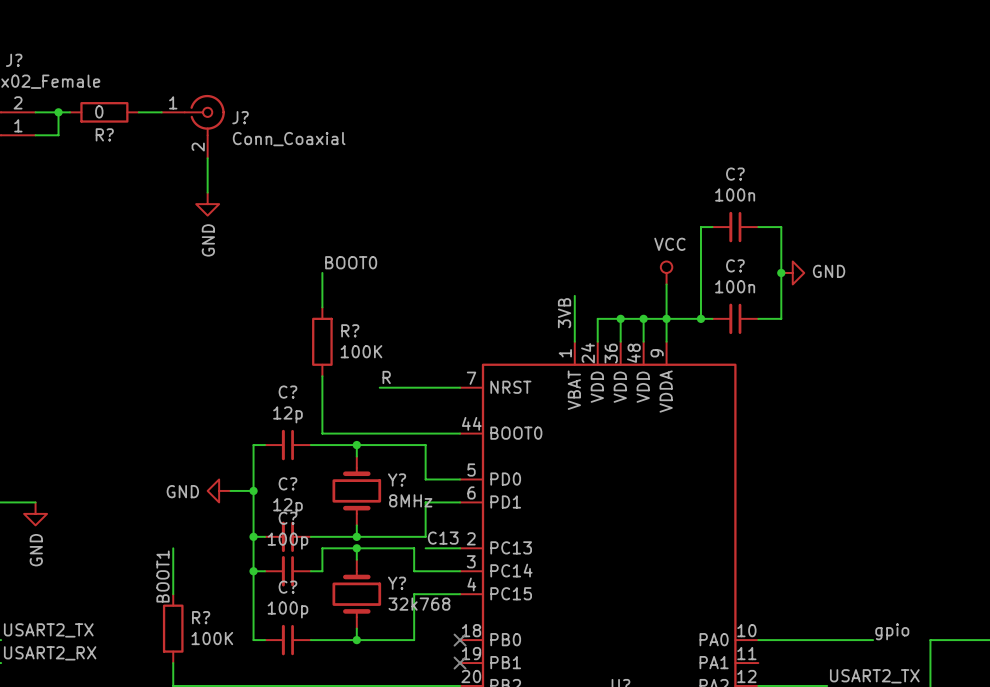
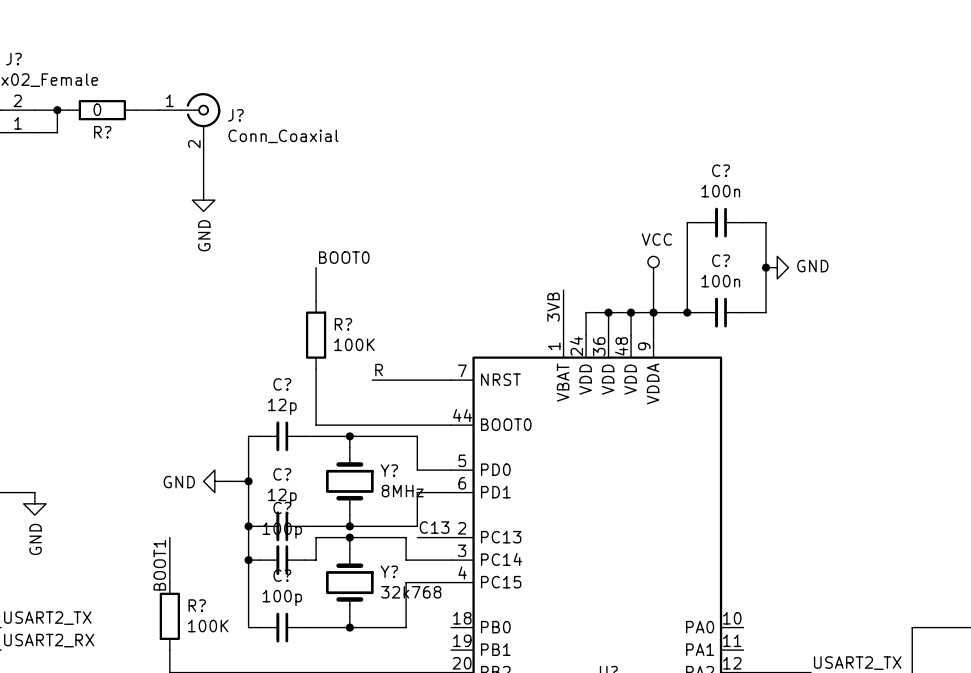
label: gpio (892, 631) -> none
no-connect mark: (460, 640) -> none
wire: (758, 640) (873, 640) -> none
no-connect mark: (460, 663) -> none

